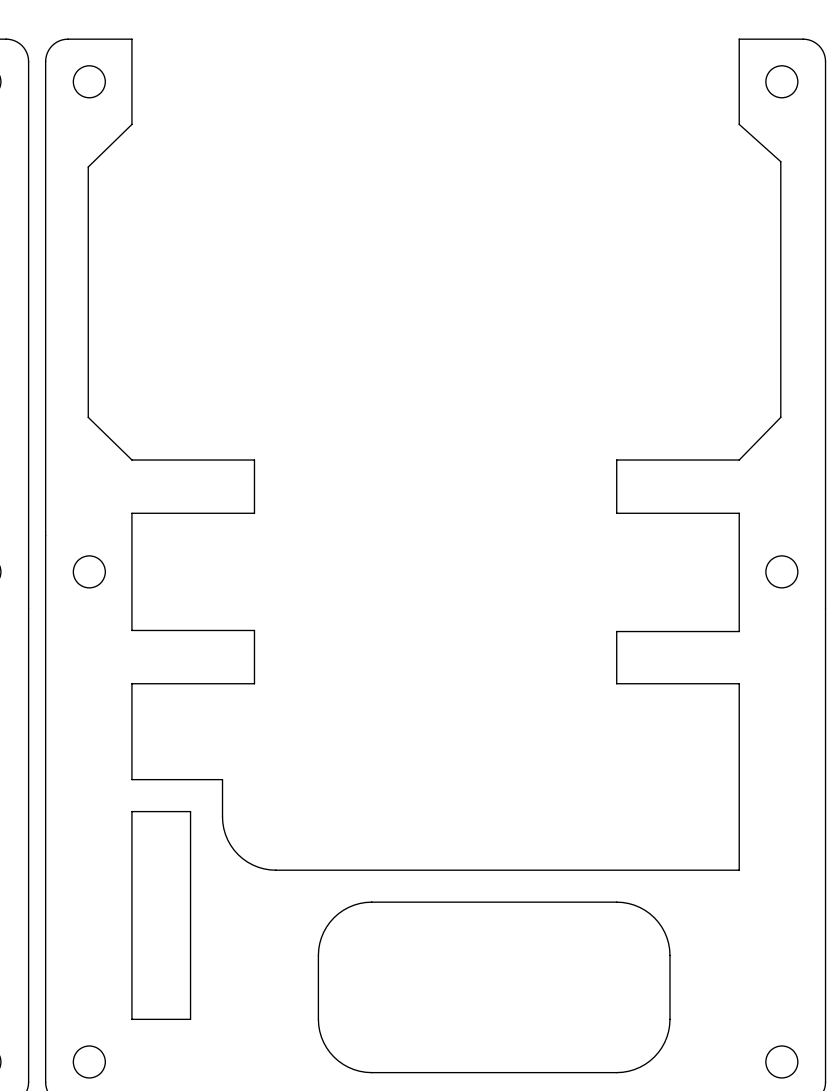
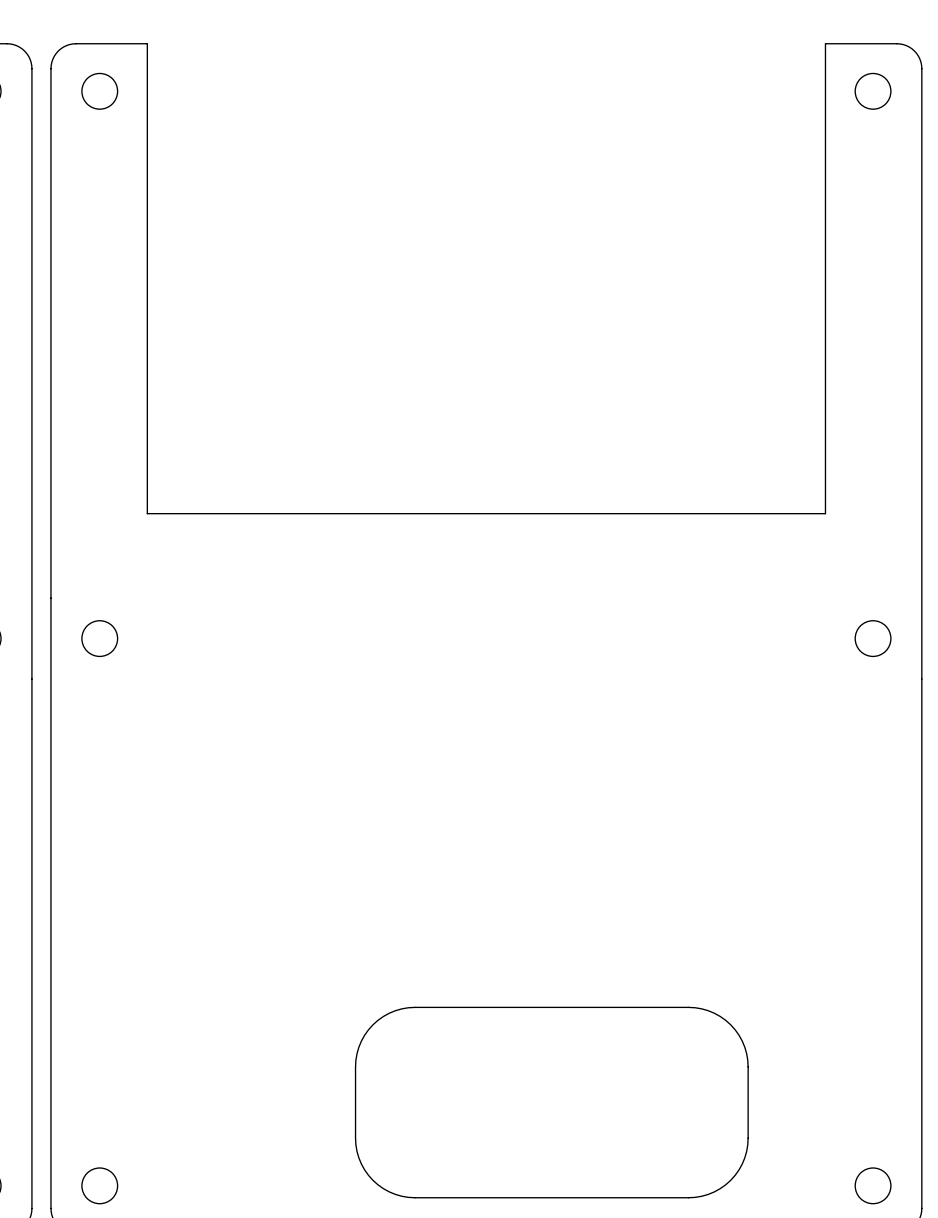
board edge: (131, 124) (88, 167) (88, 417) (131, 460) -> (147, 138) (147, 513)
board edge: (739, 124) (780, 161) (780, 417) (739, 460) -> (825, 138) (825, 513)
board edge: (254, 460) (254, 513) (131, 513) (131, 630) (254, 630) (254, 683) (131, 683) (131, 779) (222, 779) (222, 822) (227, 840) (238, 854) (247, 862) (269, 869) (739, 870) (739, 683) (616, 683) (616, 631) (739, 631) (739, 513) (616, 513) (616, 460) -> (284, 513) (688, 513)
board edge: (131, 811) (131, 1019) (190, 1019) (190, 811) (131, 811) -> none

